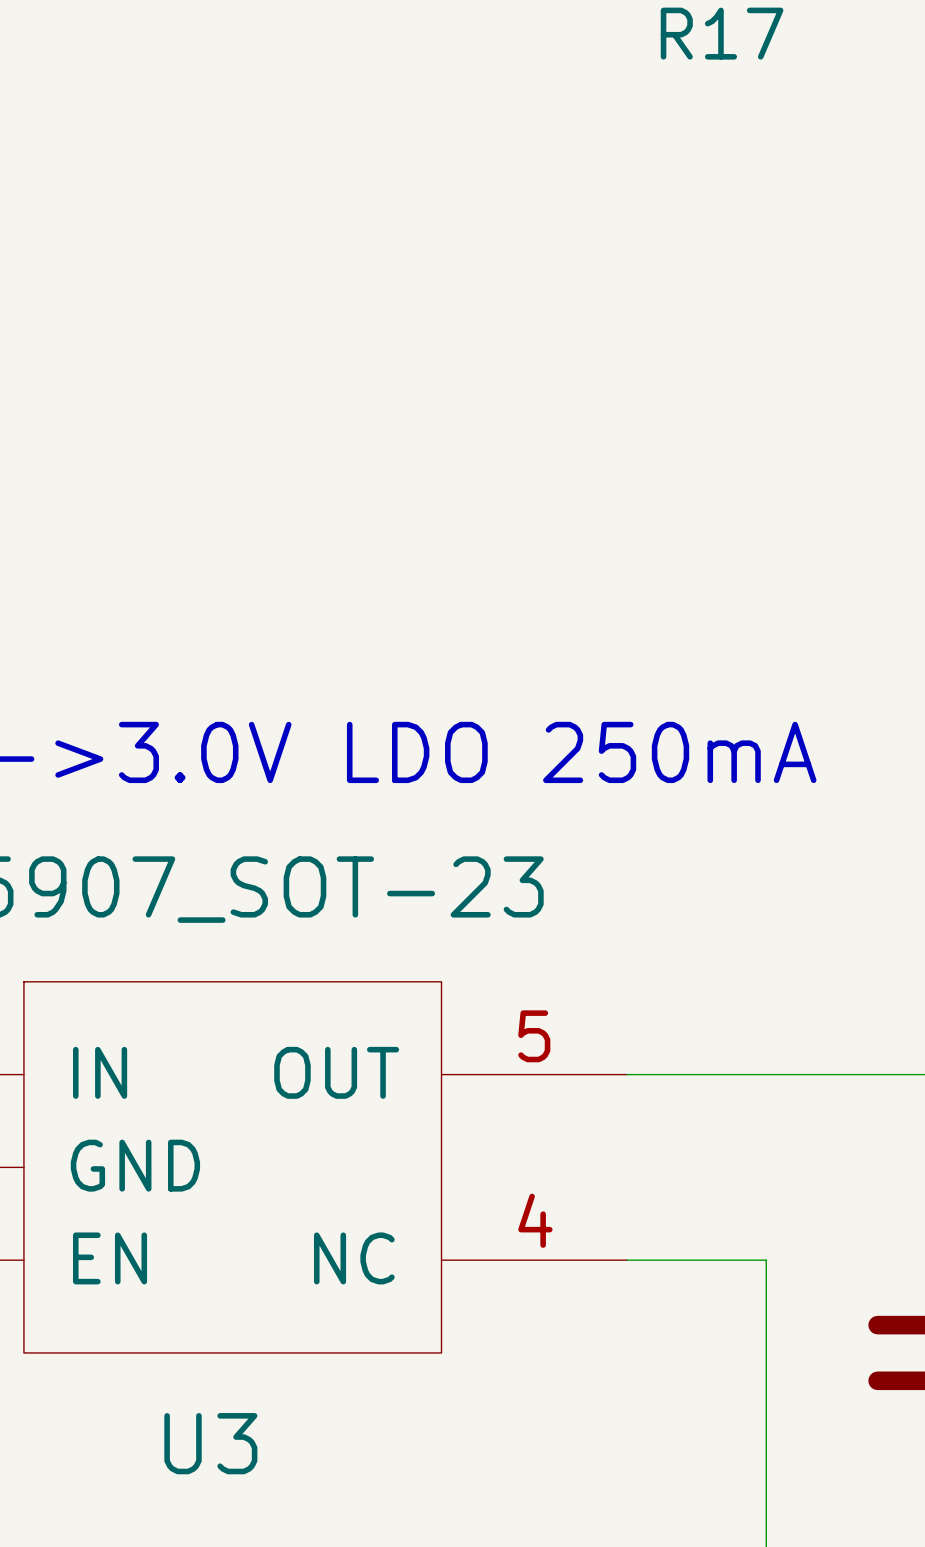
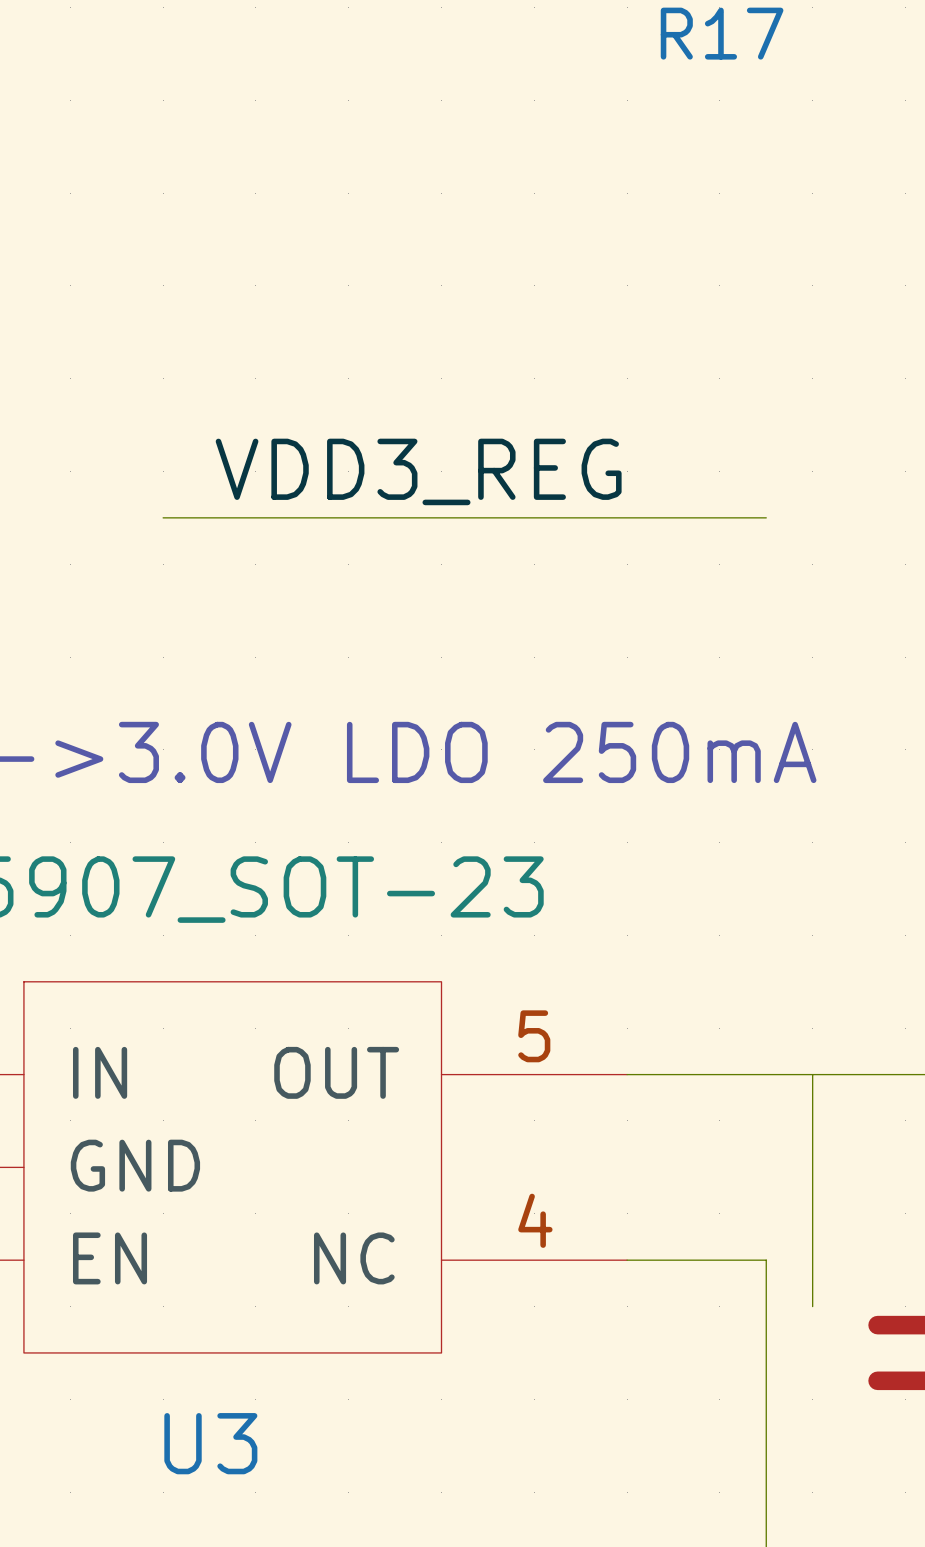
label: none -> VDD3_REG (418, 471)
wire: none -> (163, 517) (766, 517)
wire: none -> (812, 1074) (812, 1306)

